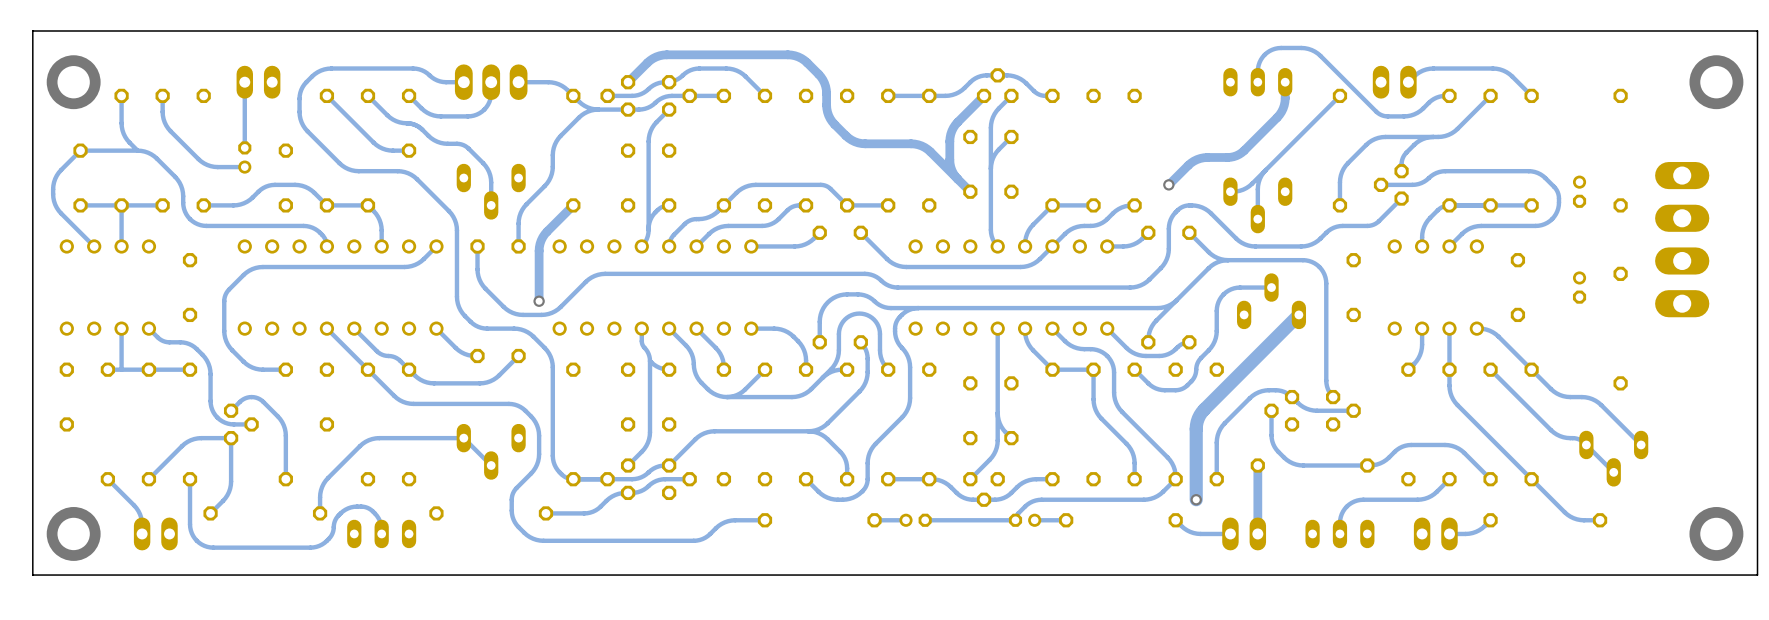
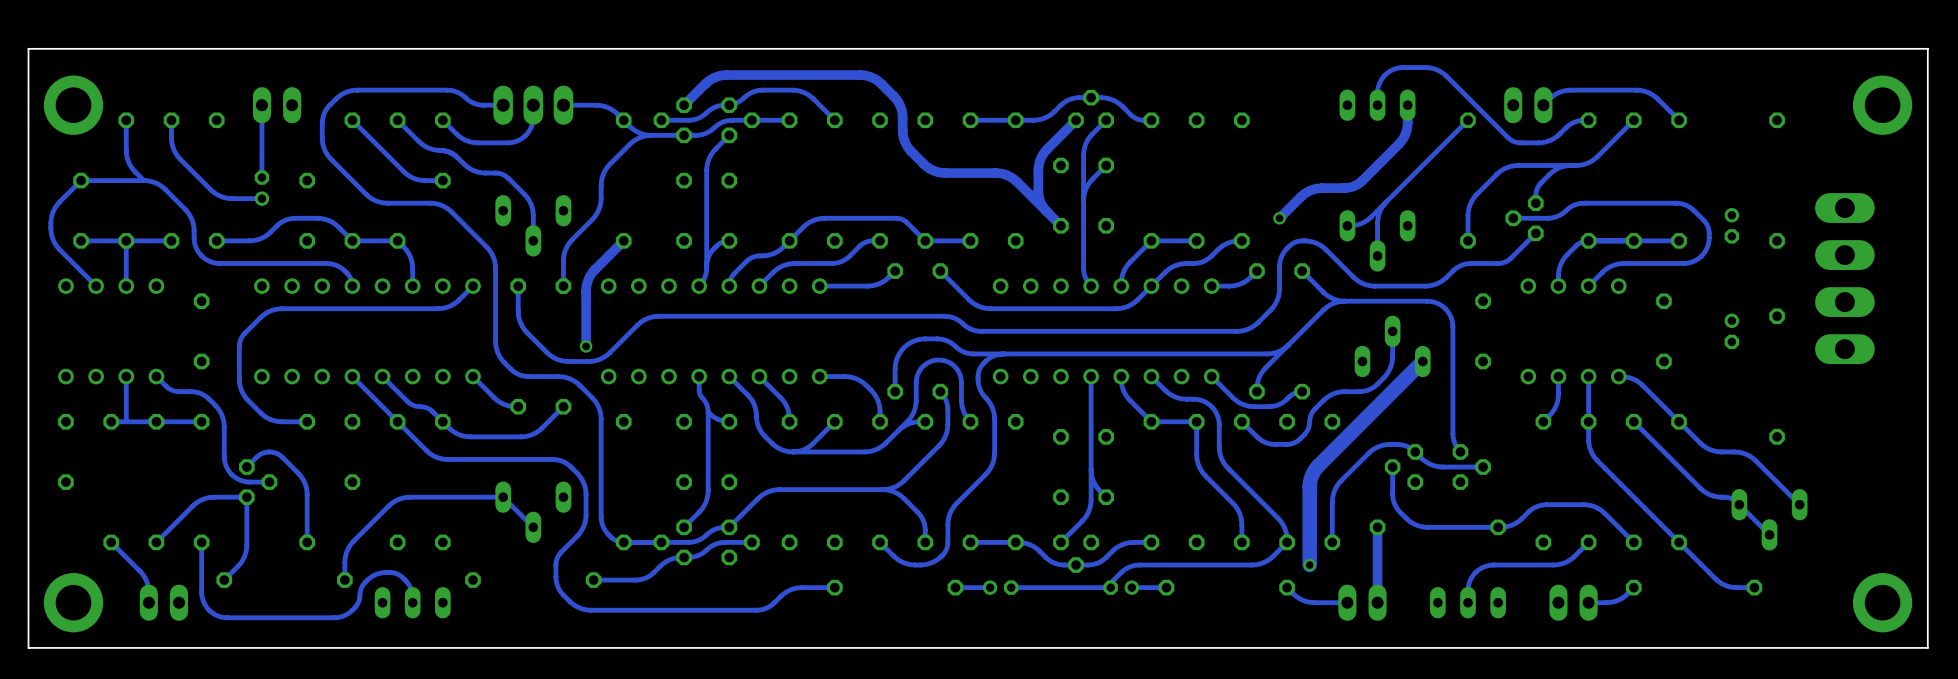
track: (1271, 287) (1237, 287) (1223, 294) (1216, 307) (1215, 338) (1208, 350) -> (1392, 331) (1391, 364) (1386, 374) (1377, 384) (1366, 390) (1337, 392) (1323, 400)

